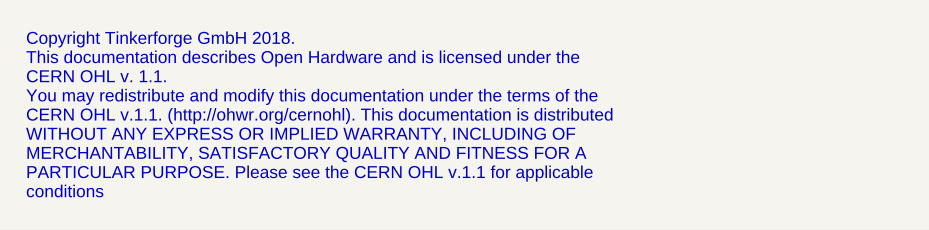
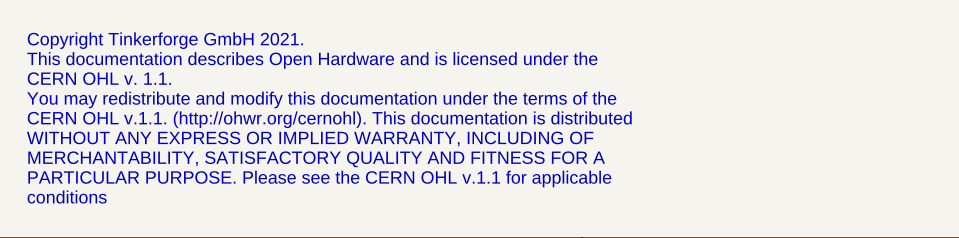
text: Copyright Tinkerforge GmbH 2018. (160, 39) -> Copyright Tinkerforge GmbH 2021. (165, 40)

